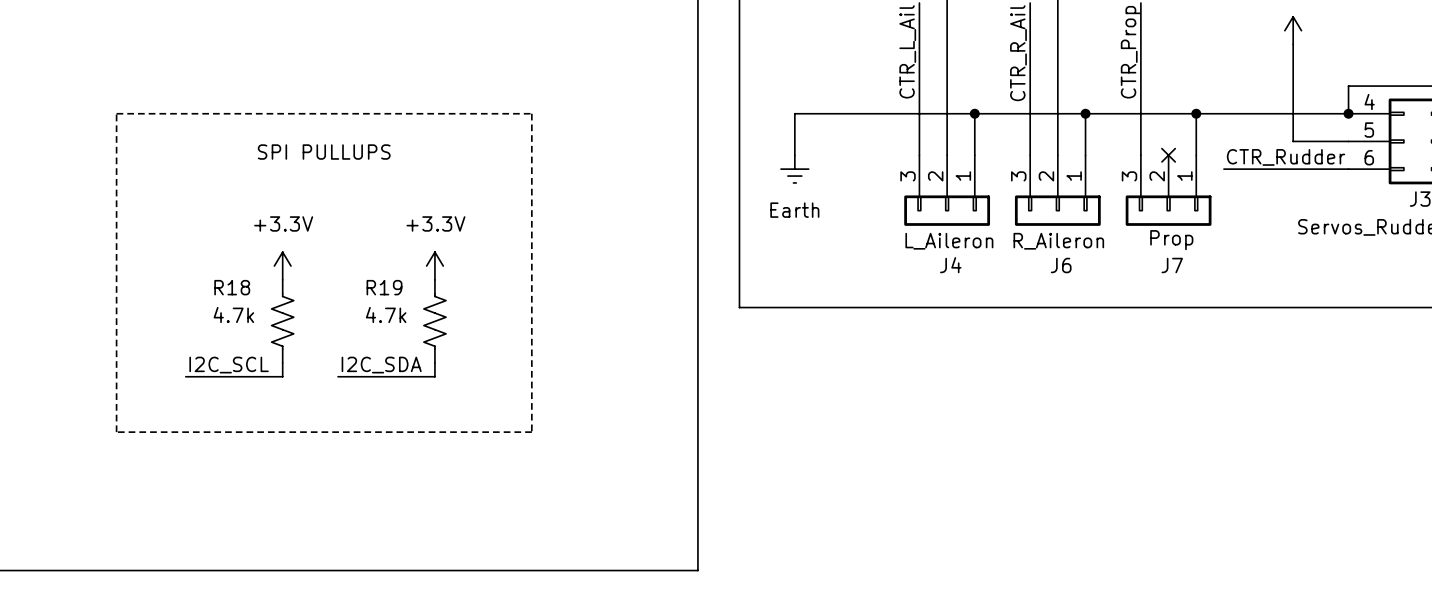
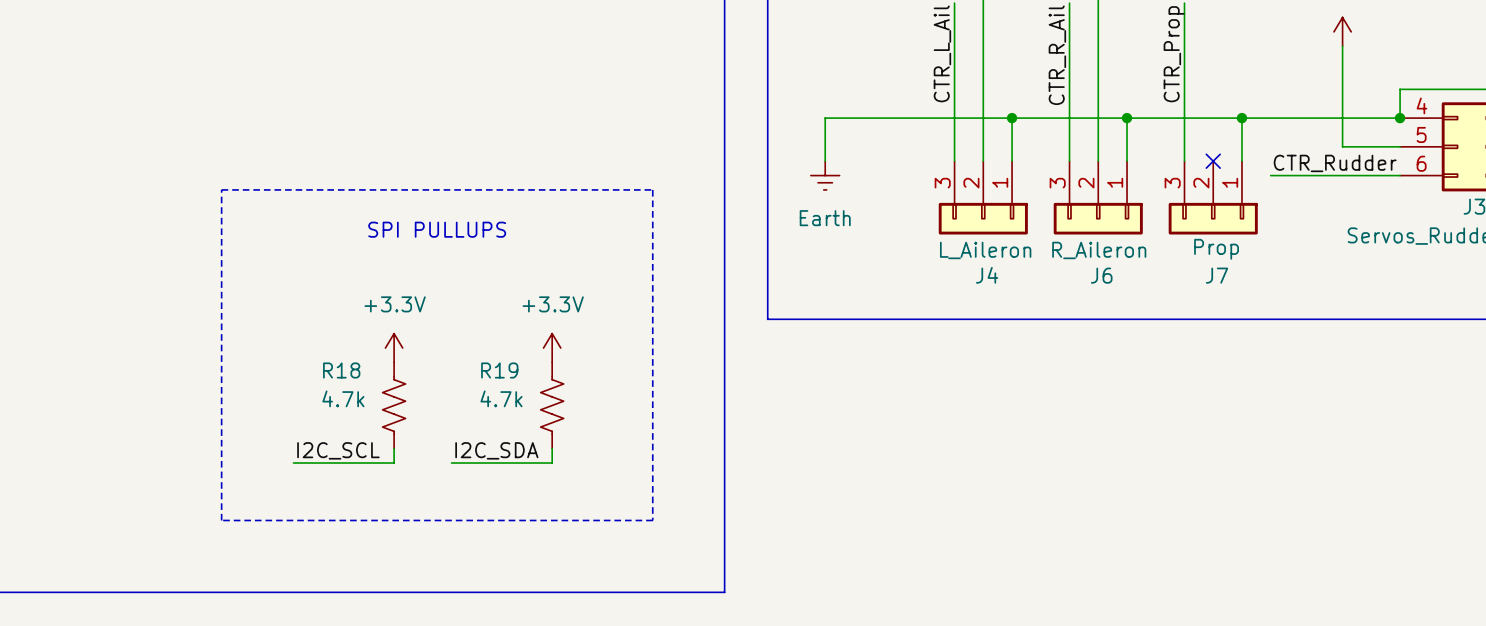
line: (116, 113) (531, 113) (531, 432) (116, 432) (116, 113) -> (221, 189) (652, 189) (652, 520) (221, 520) (221, 189)
text position: SPI PULLUPS (324, 152) -> SPI PULLUPS (437, 229)
power symbol: +3.3V (282, 266) -> none
power symbol: +3.3V (434, 266) -> none
R18 position: (282, 321) -> (394, 405)
R19 position: (434, 321) -> (552, 405)
power symbol: none -> +3.3V (394, 348)
power symbol: none -> +3.3V (552, 348)
wire: (282, 362) (282, 376) (185, 376) -> (552, 448) (552, 463) (451, 463)
wire: (434, 362) (434, 376) (338, 376) -> (394, 448) (394, 463) (293, 463)
label position: I2C_SCL (229, 365) -> I2C_SCL (338, 450)
label position: I2C_SDA (381, 365) -> I2C_SDA (496, 450)

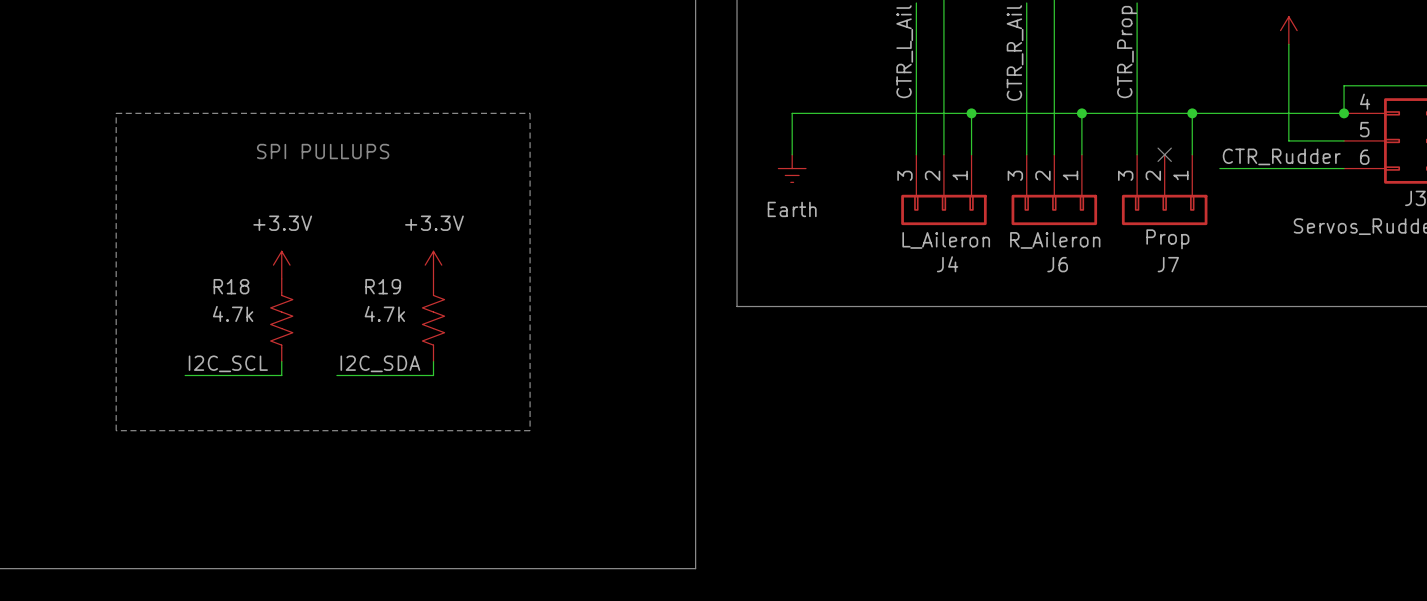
line: (221, 189) (652, 189) (652, 520) (221, 520) (221, 189) -> (116, 113) (530, 113) (530, 430) (116, 430) (116, 113)
text position: SPI PULLUPS (437, 229) -> SPI PULLUPS (323, 151)
power symbol: none -> +3.3V (281, 265)
power symbol: none -> +3.3V (433, 265)
power symbol: +3.3V (394, 348) -> none
power symbol: +3.3V (552, 348) -> none
R18 position: (394, 405) -> (281, 320)
R19 position: (552, 405) -> (433, 320)
wire: (394, 448) (394, 463) (293, 463) -> (433, 361) (433, 375) (336, 375)
wire: (552, 448) (552, 463) (451, 463) -> (281, 361) (281, 375) (185, 375)
label position: I2C_SCL (338, 450) -> I2C_SCL (228, 363)
label position: I2C_SDA (496, 450) -> I2C_SDA (380, 363)

